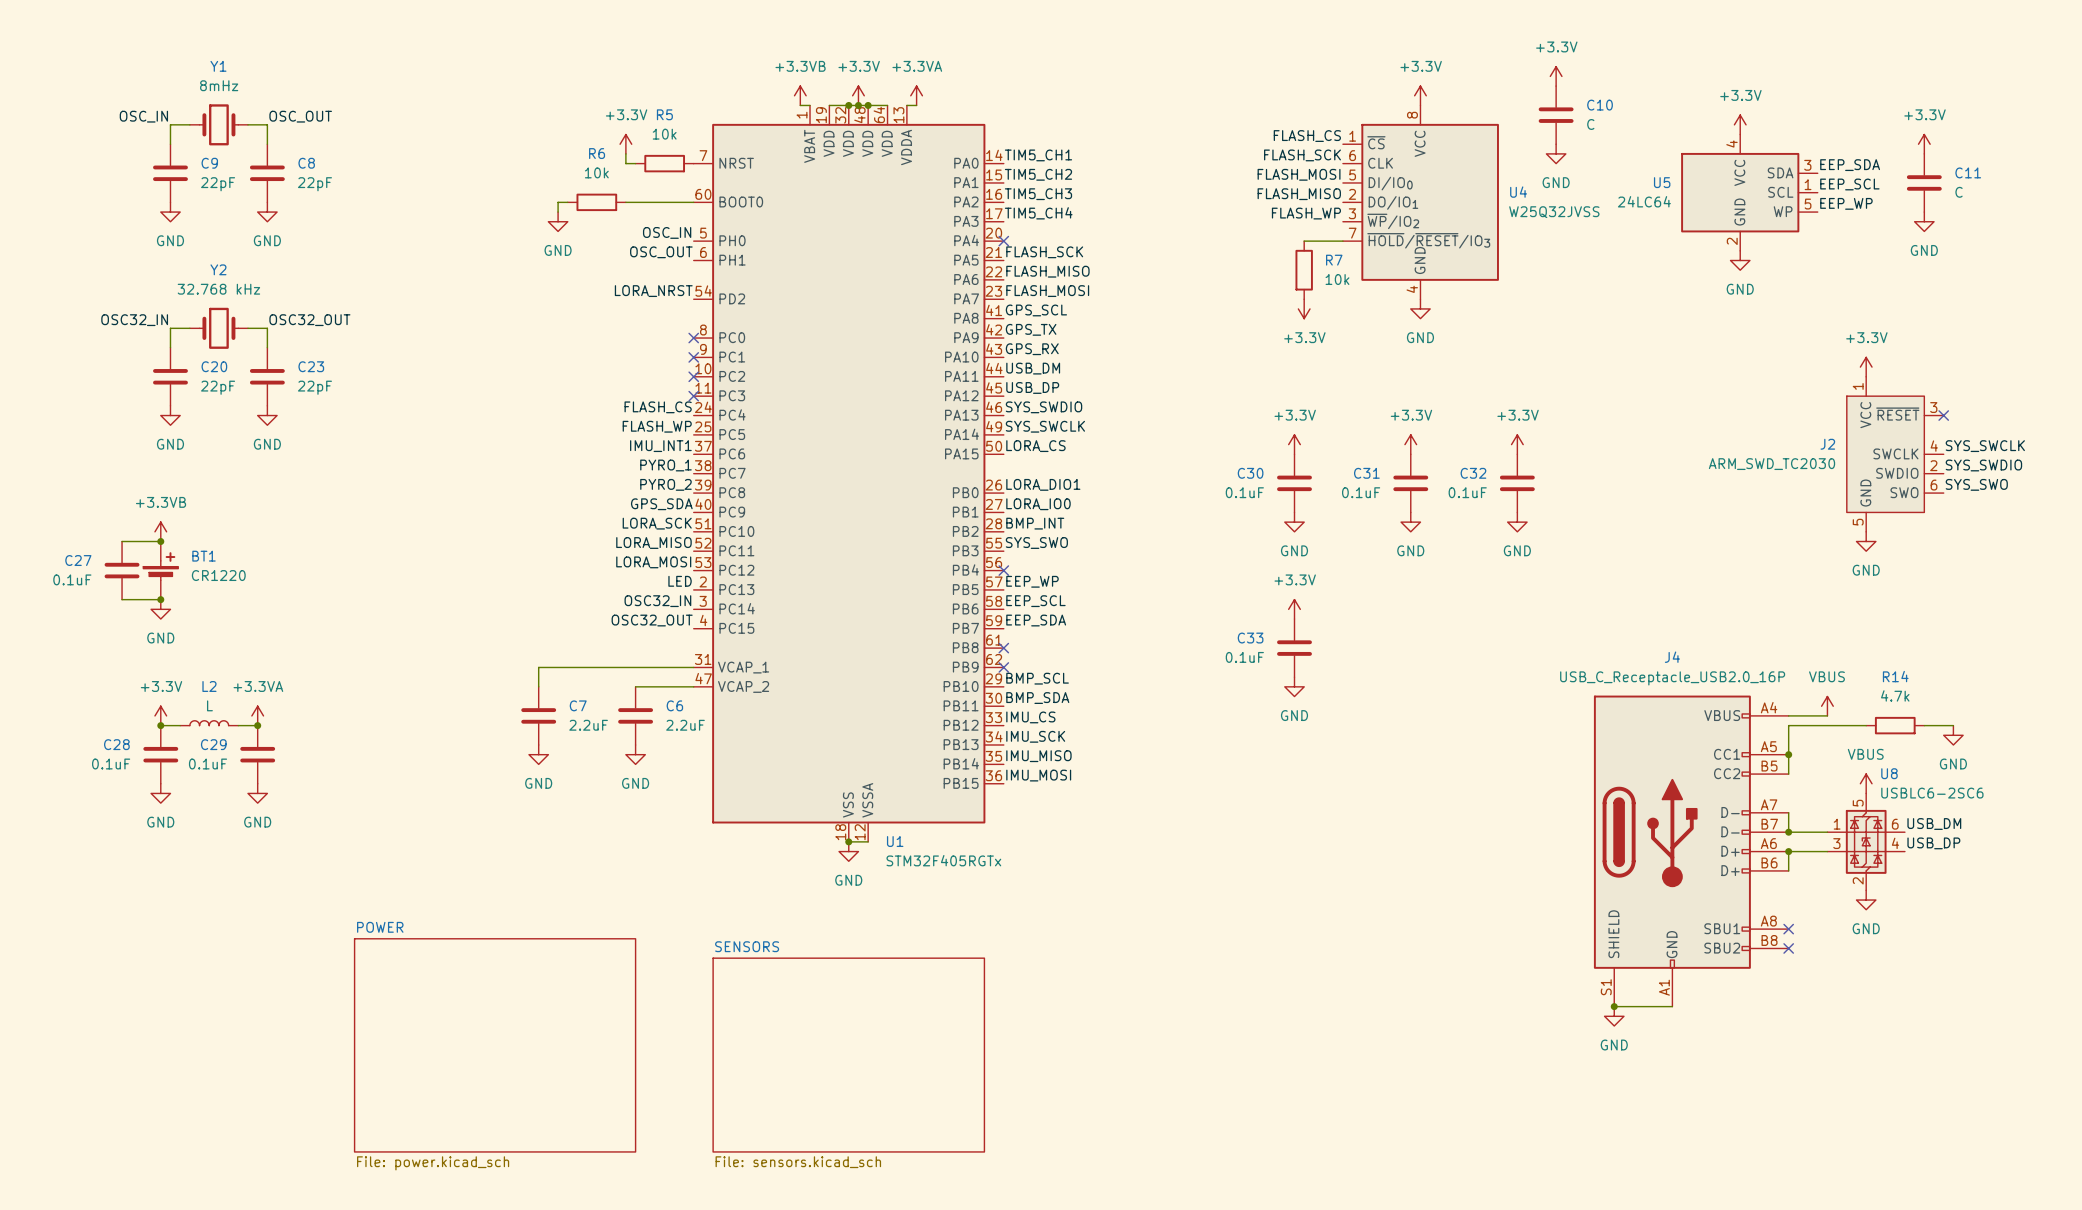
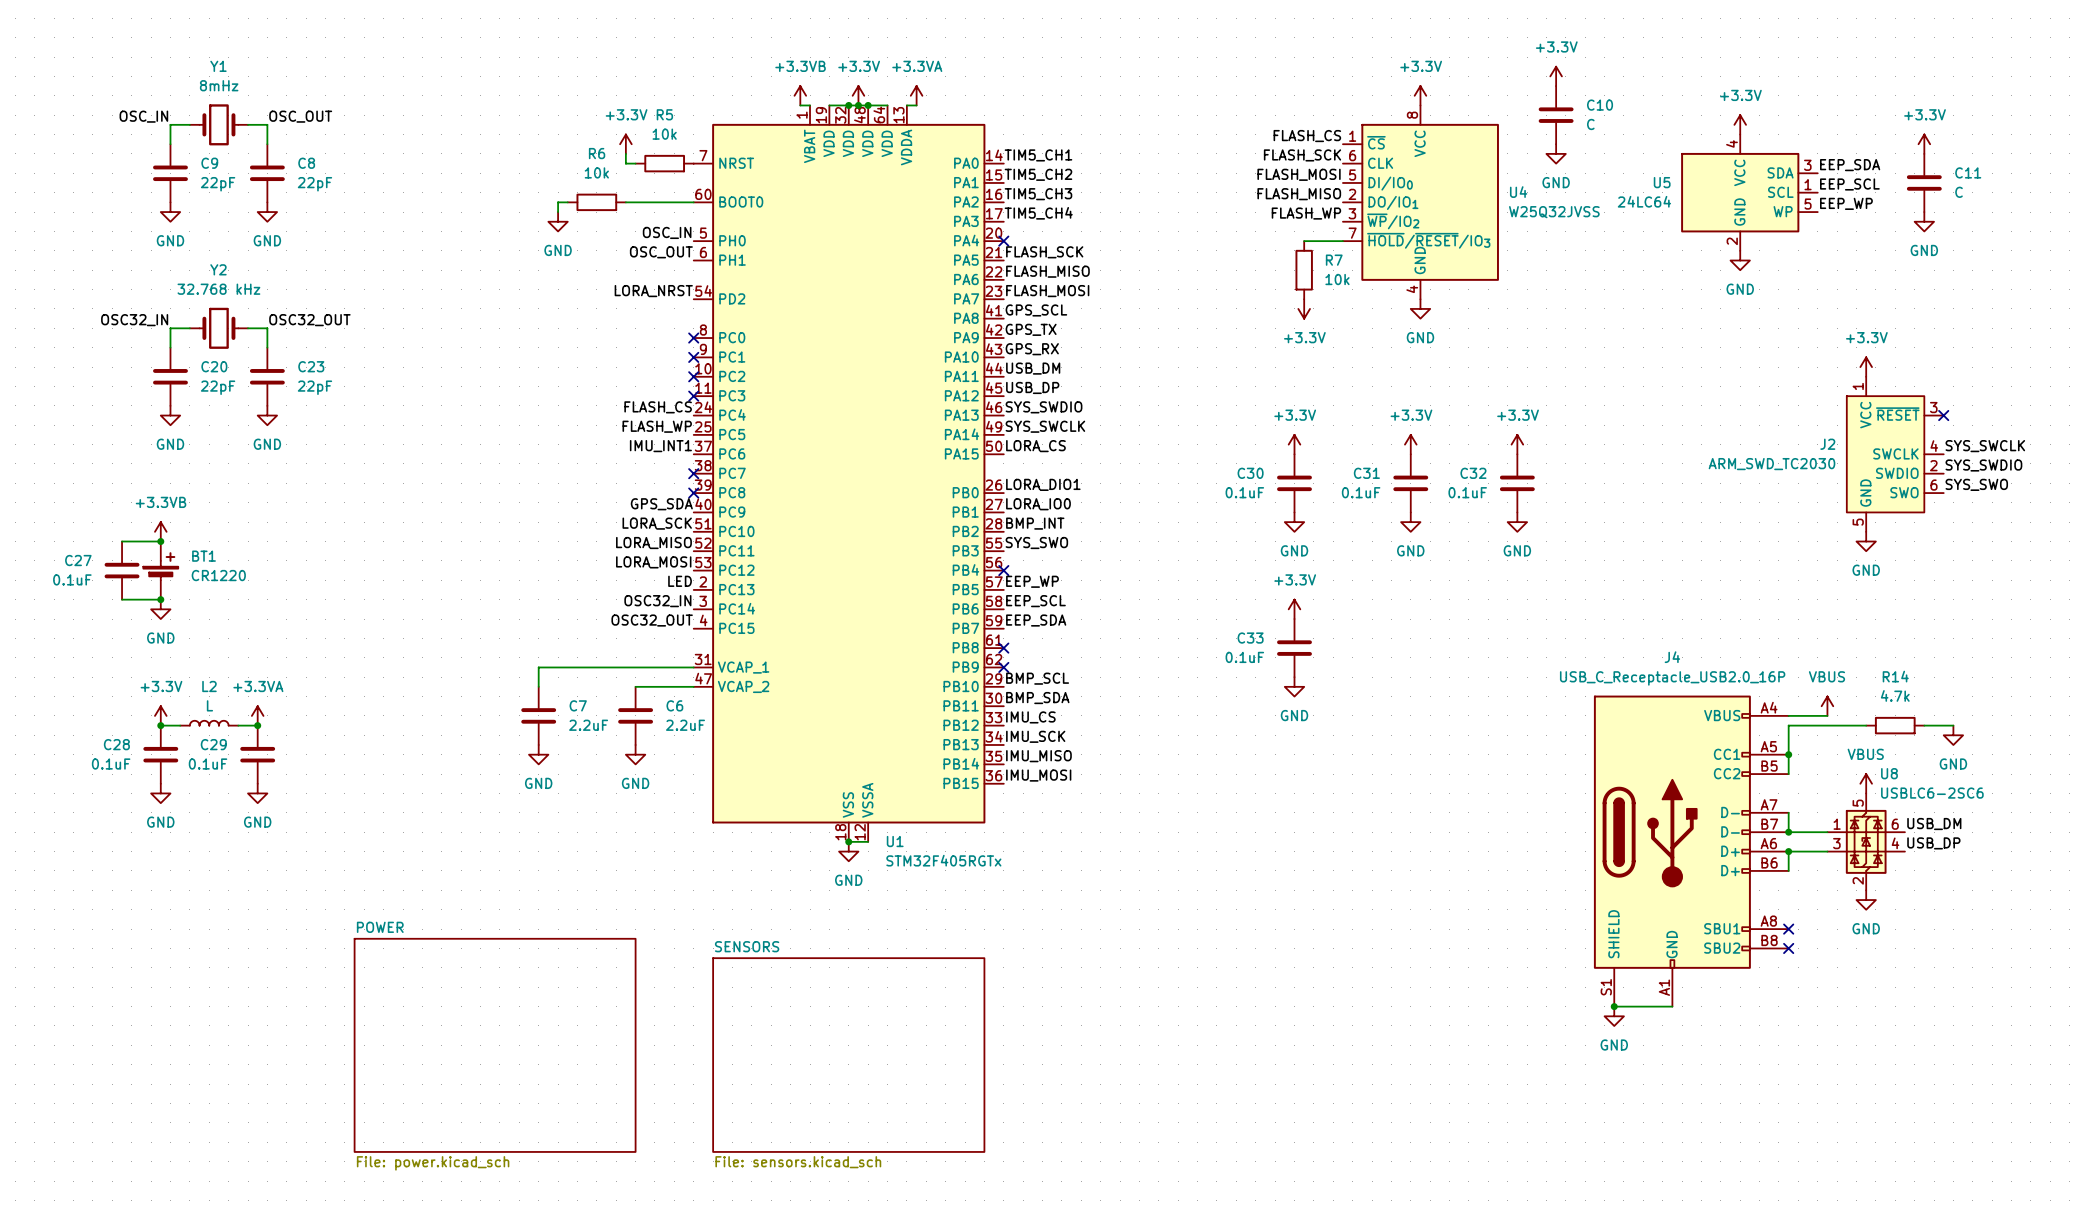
label: PYRO_1 (665, 465) -> none
no-connect mark: none -> (693, 473)
label: PYRO_2 (665, 484) -> none
no-connect mark: none -> (693, 493)

